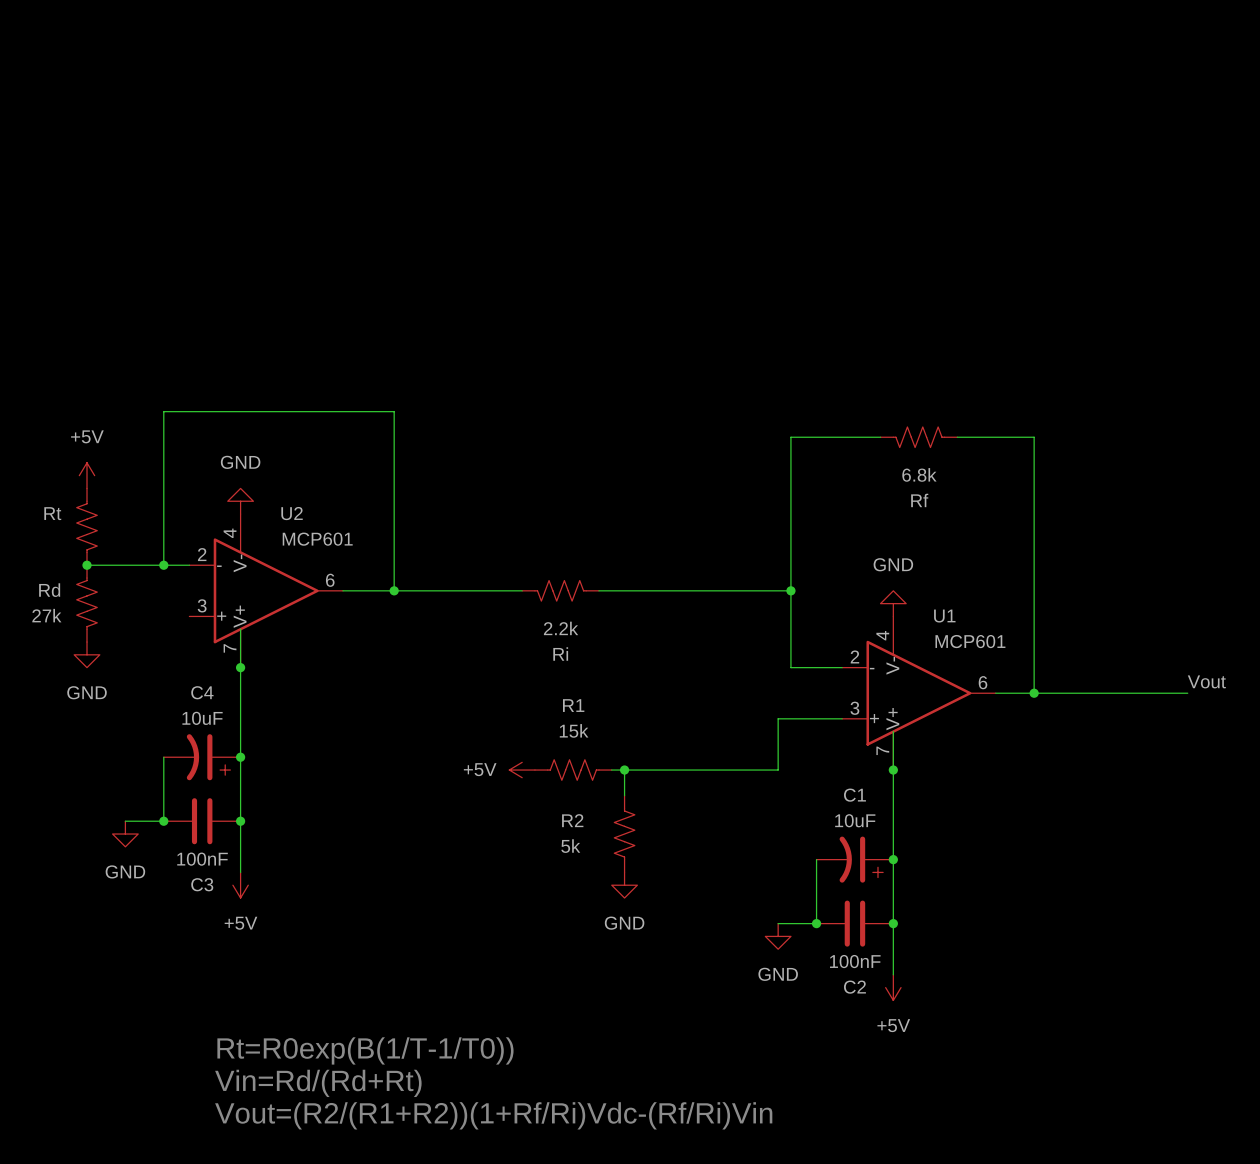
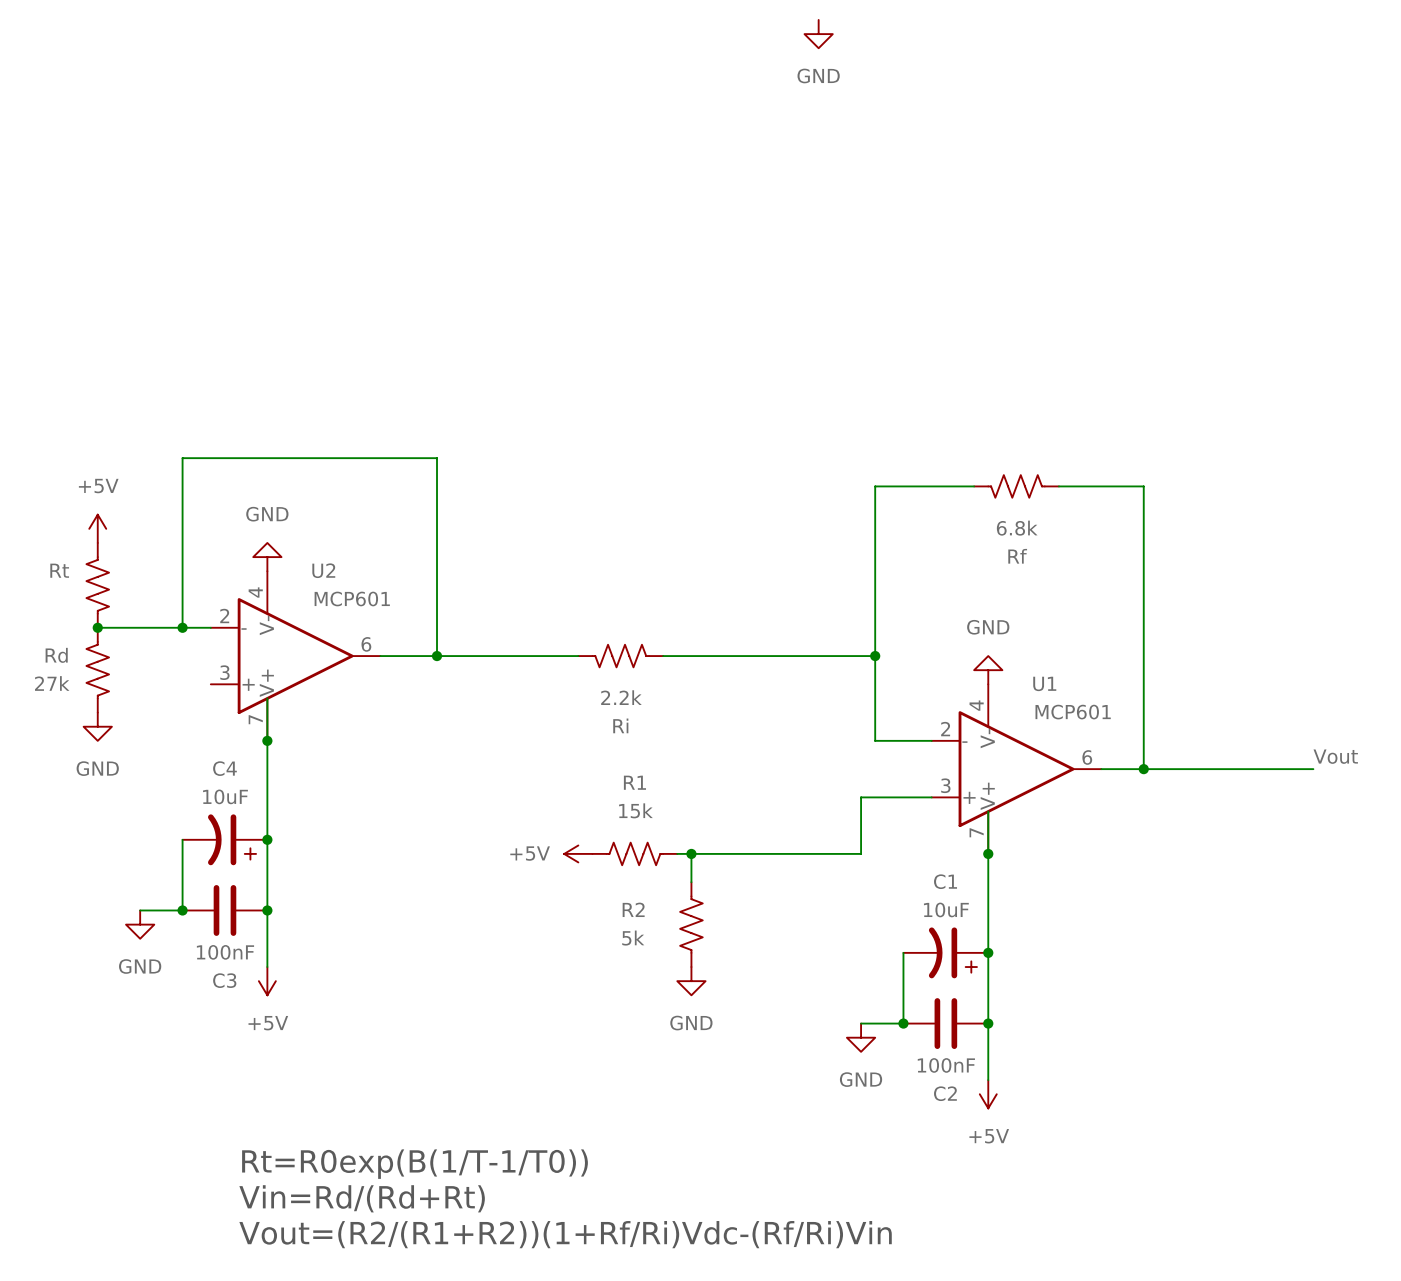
power symbol: none -> GND (818, 34)

